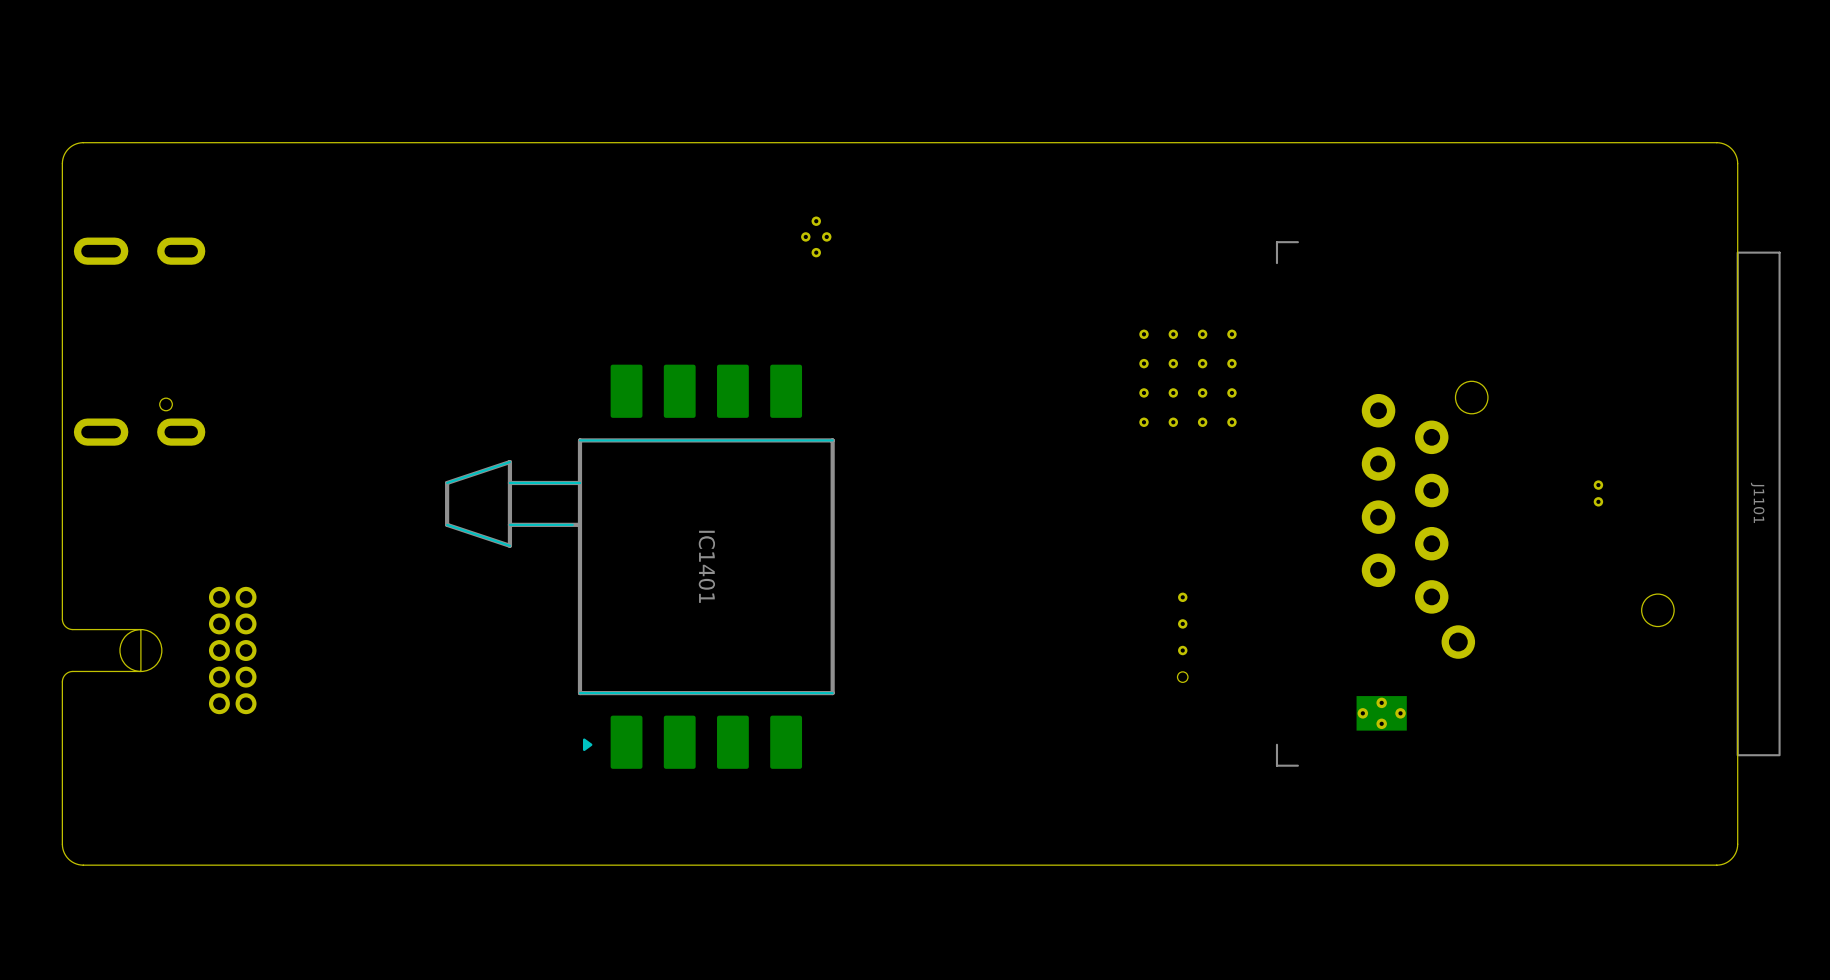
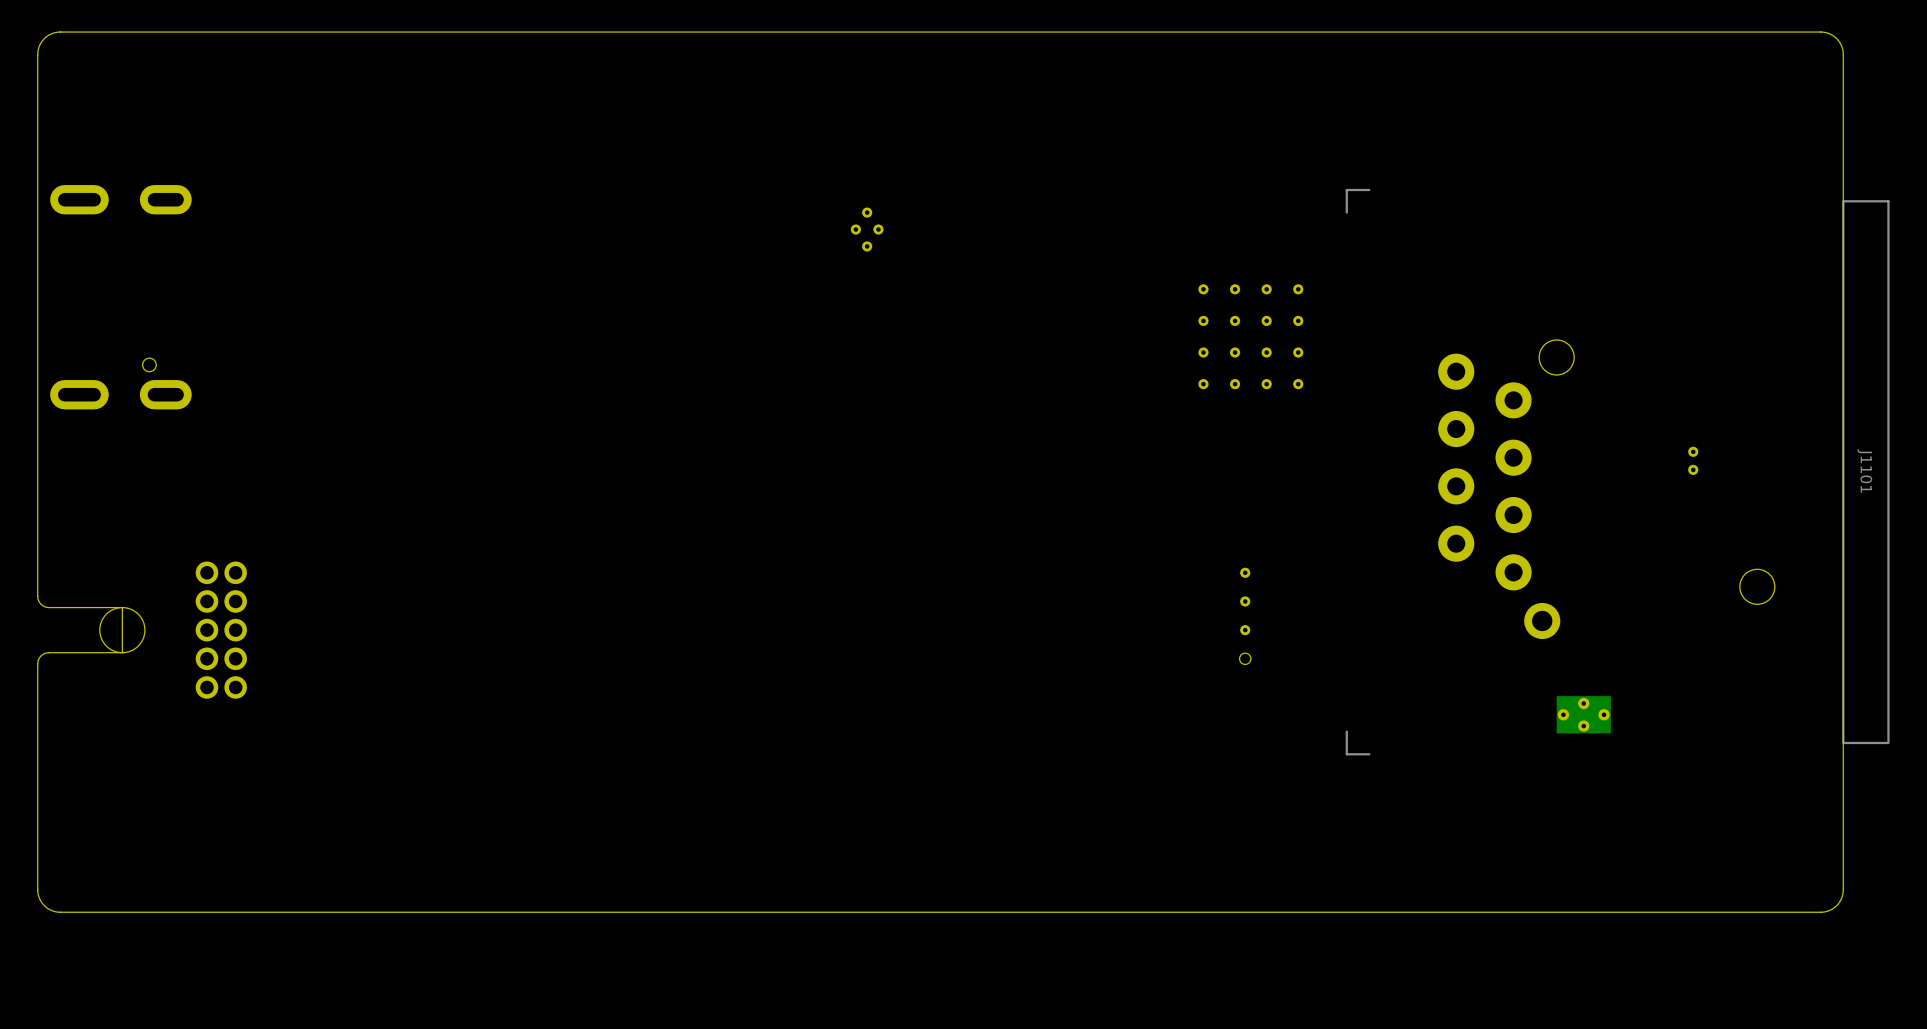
board edge: (1737, 163) (1735, 154) (1731, 148) (1723, 143) (1716, 142) (83, 142) (76, 143) (68, 148) (63, 156) (62, 163) -> (1843, 105) (1842, 47) (1834, 36) (1820, 32) (60, 32) (46, 36) (38, 47) (37, 105)
part position: (816, 236) -> (867, 229)
IC1401: (639, 566) -> none
part position: (1381, 713) -> (1583, 714)
board edge: (1737, 844) (1735, 853) (1731, 859) (1725, 863) (1716, 865) (83, 865) (74, 863) (68, 859) (64, 853) (62, 844) -> (1843, 838) (1842, 897) (1834, 907) (1820, 912) (60, 912) (46, 907) (38, 897) (37, 838)

